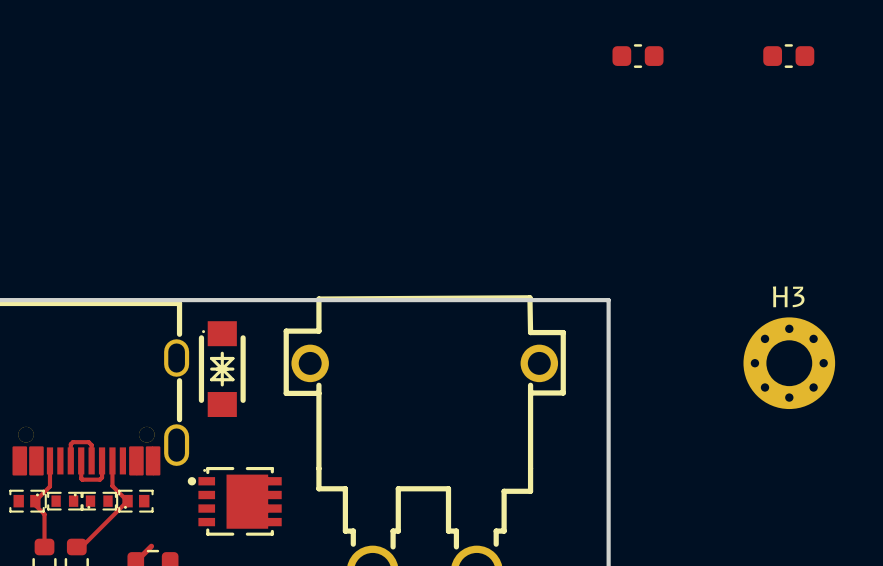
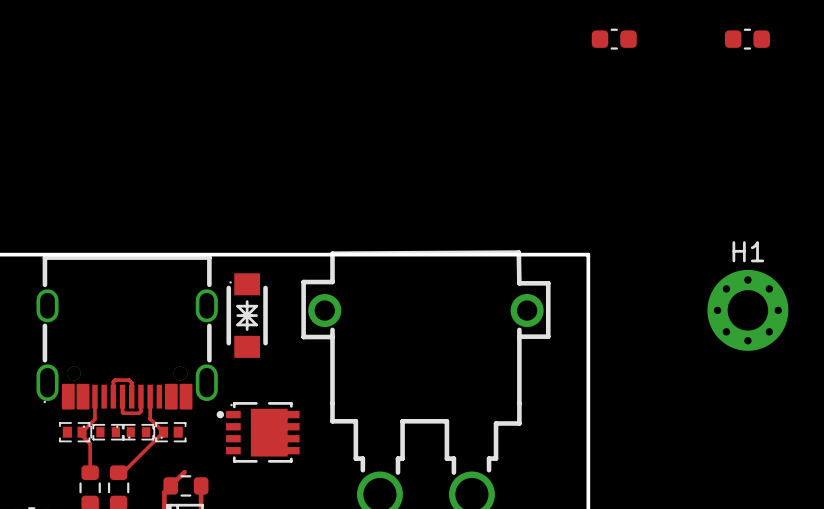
H3 name: H3 (788, 296) -> H1 (748, 251)

